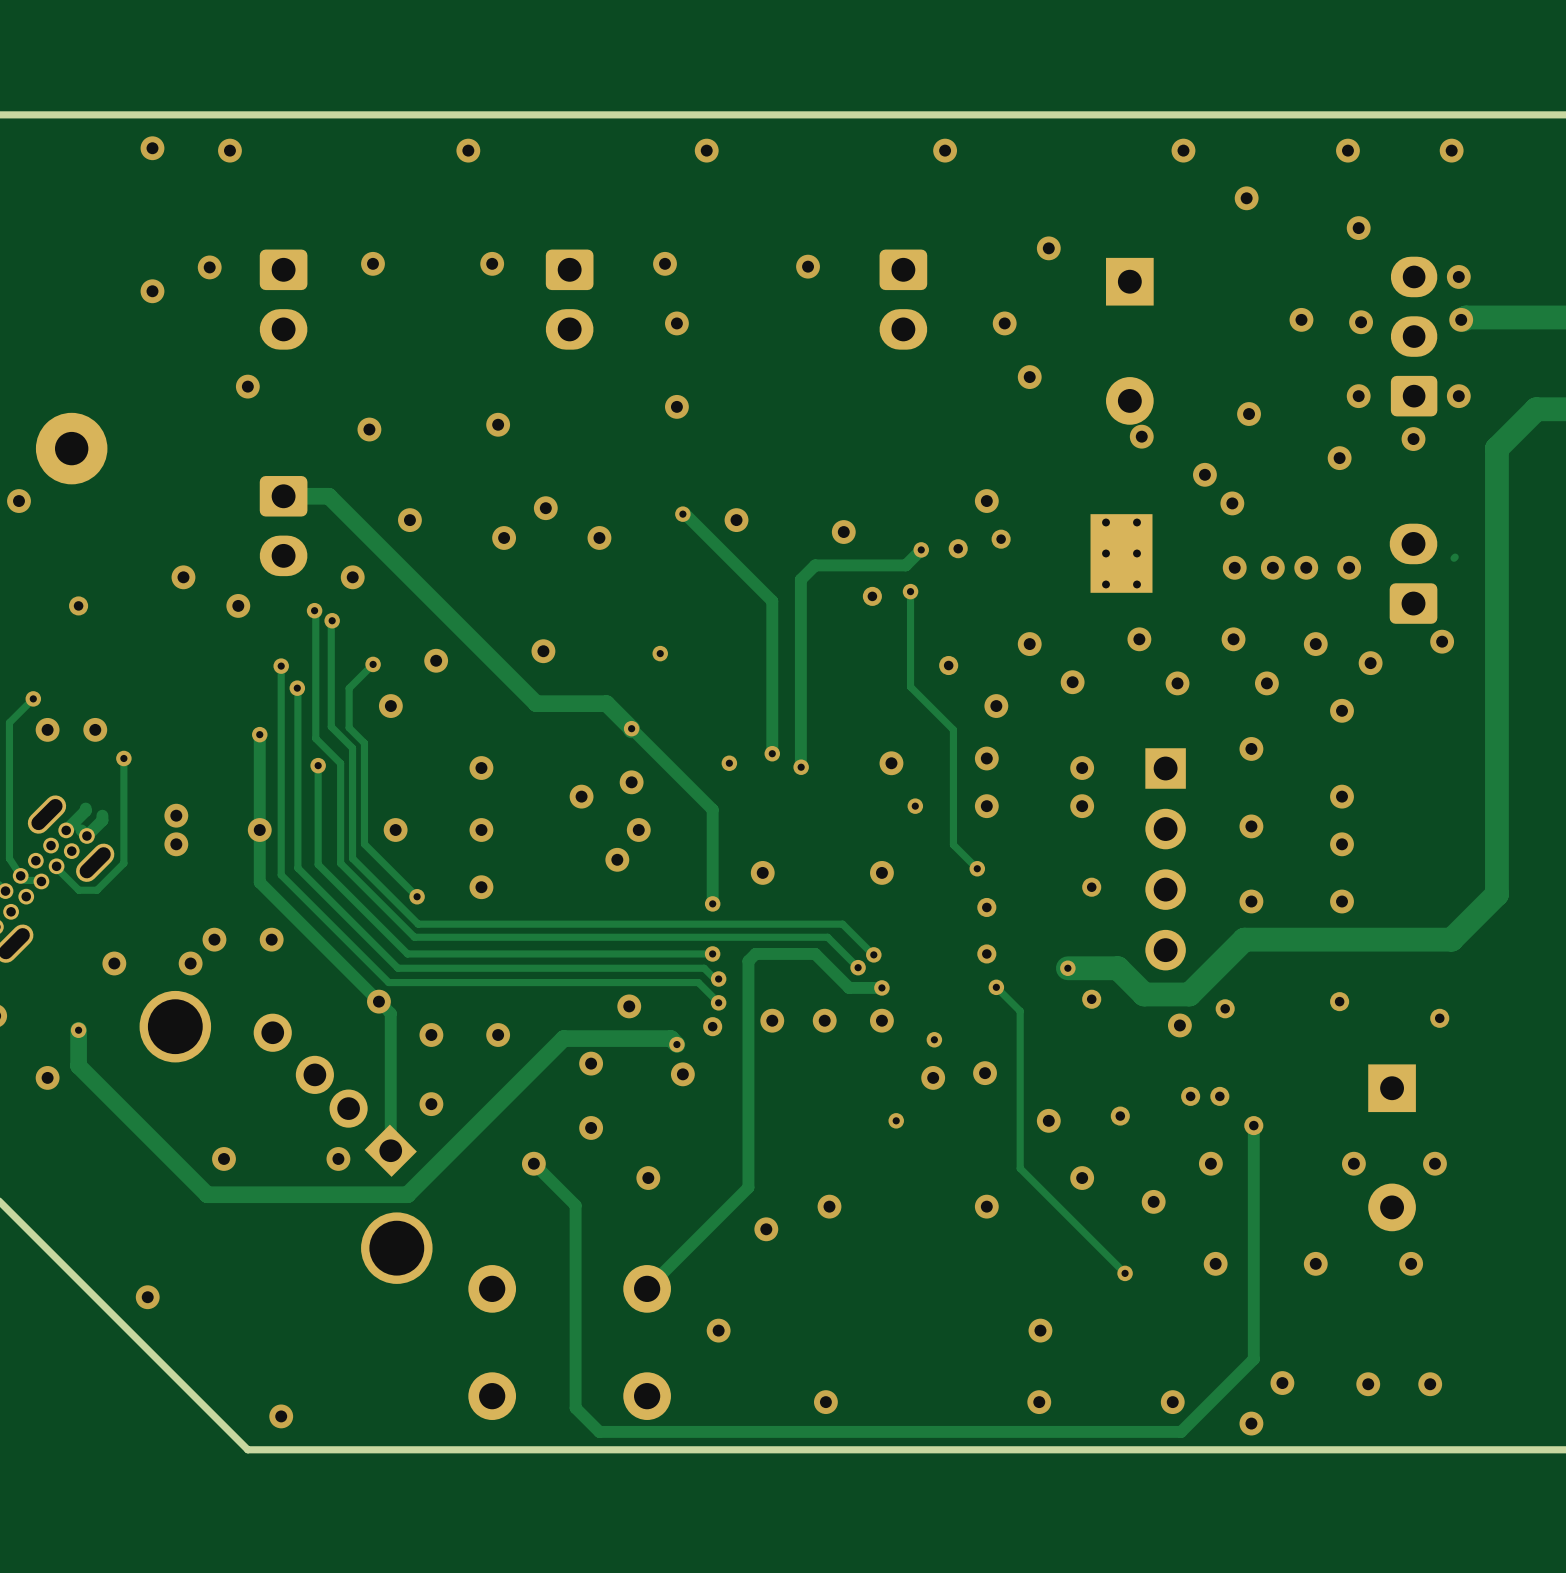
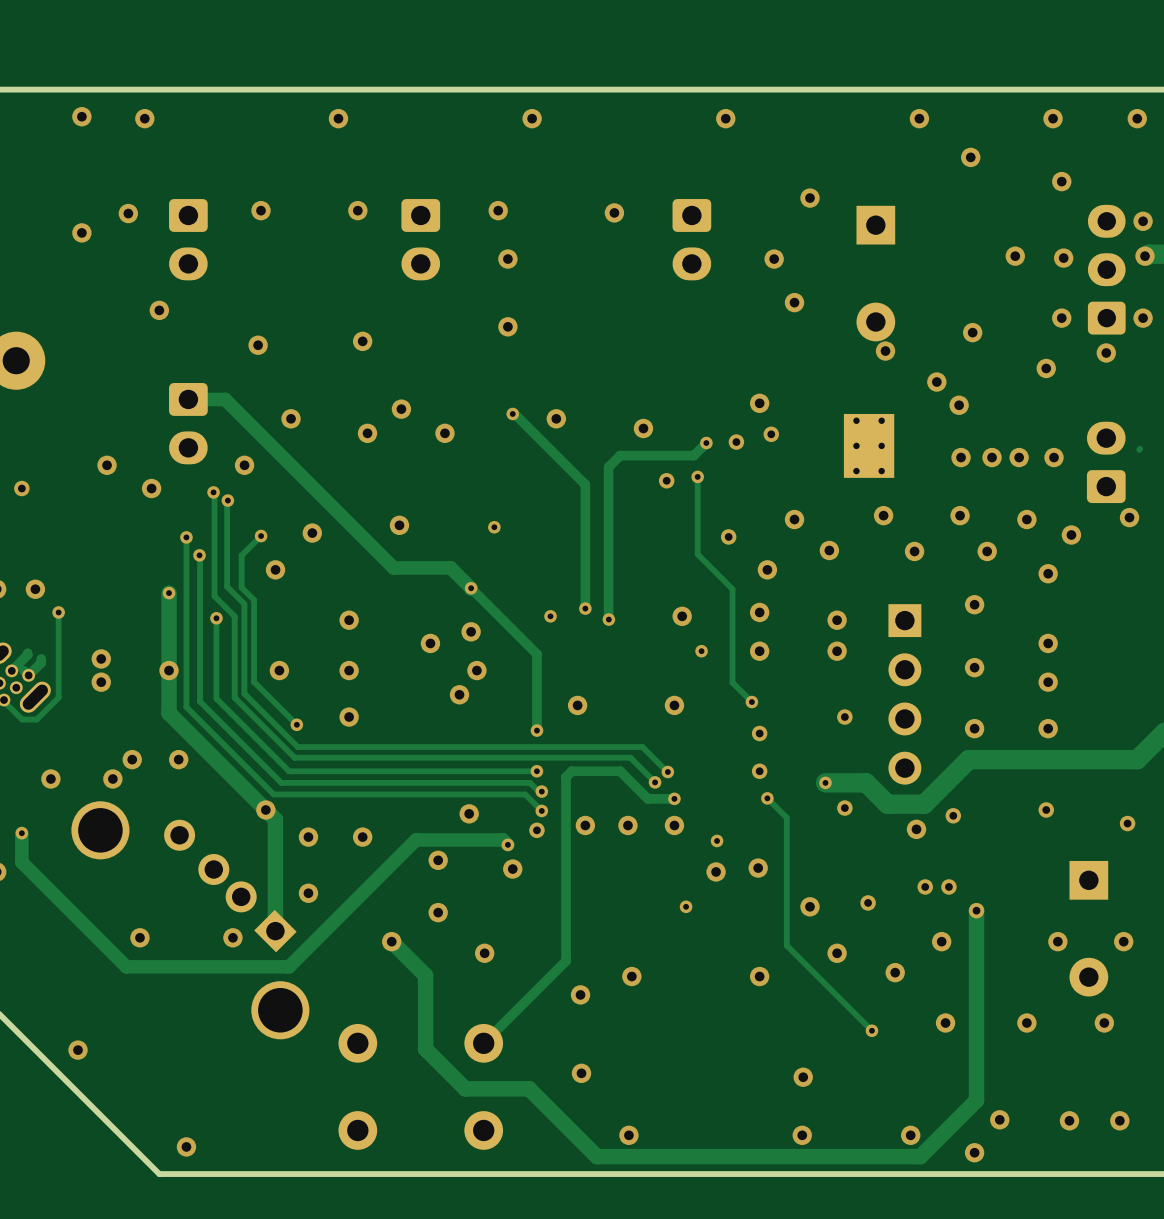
track width: thin (259, 734) (259, 882) (390, 1013) (390, 1150) -> thick (169, 593) (169, 713) (275, 819) (275, 931)
track width: thin (1253, 1125) (1253, 1359) (1184, 1428) -> thick (976, 910) (976, 1100) (920, 1156)
track width: thin (533, 1163) (575, 1205) (575, 1296) -> thick (391, 941) (425, 975) (425, 1049)
track: (575, 1296) (575, 1408) (599, 1431) (1181, 1431) (1184, 1428) -> (425, 1049) (465, 1088) (529, 1088) (596, 1156) (920, 1156)
via position: (718, 1330) -> (581, 1073)

